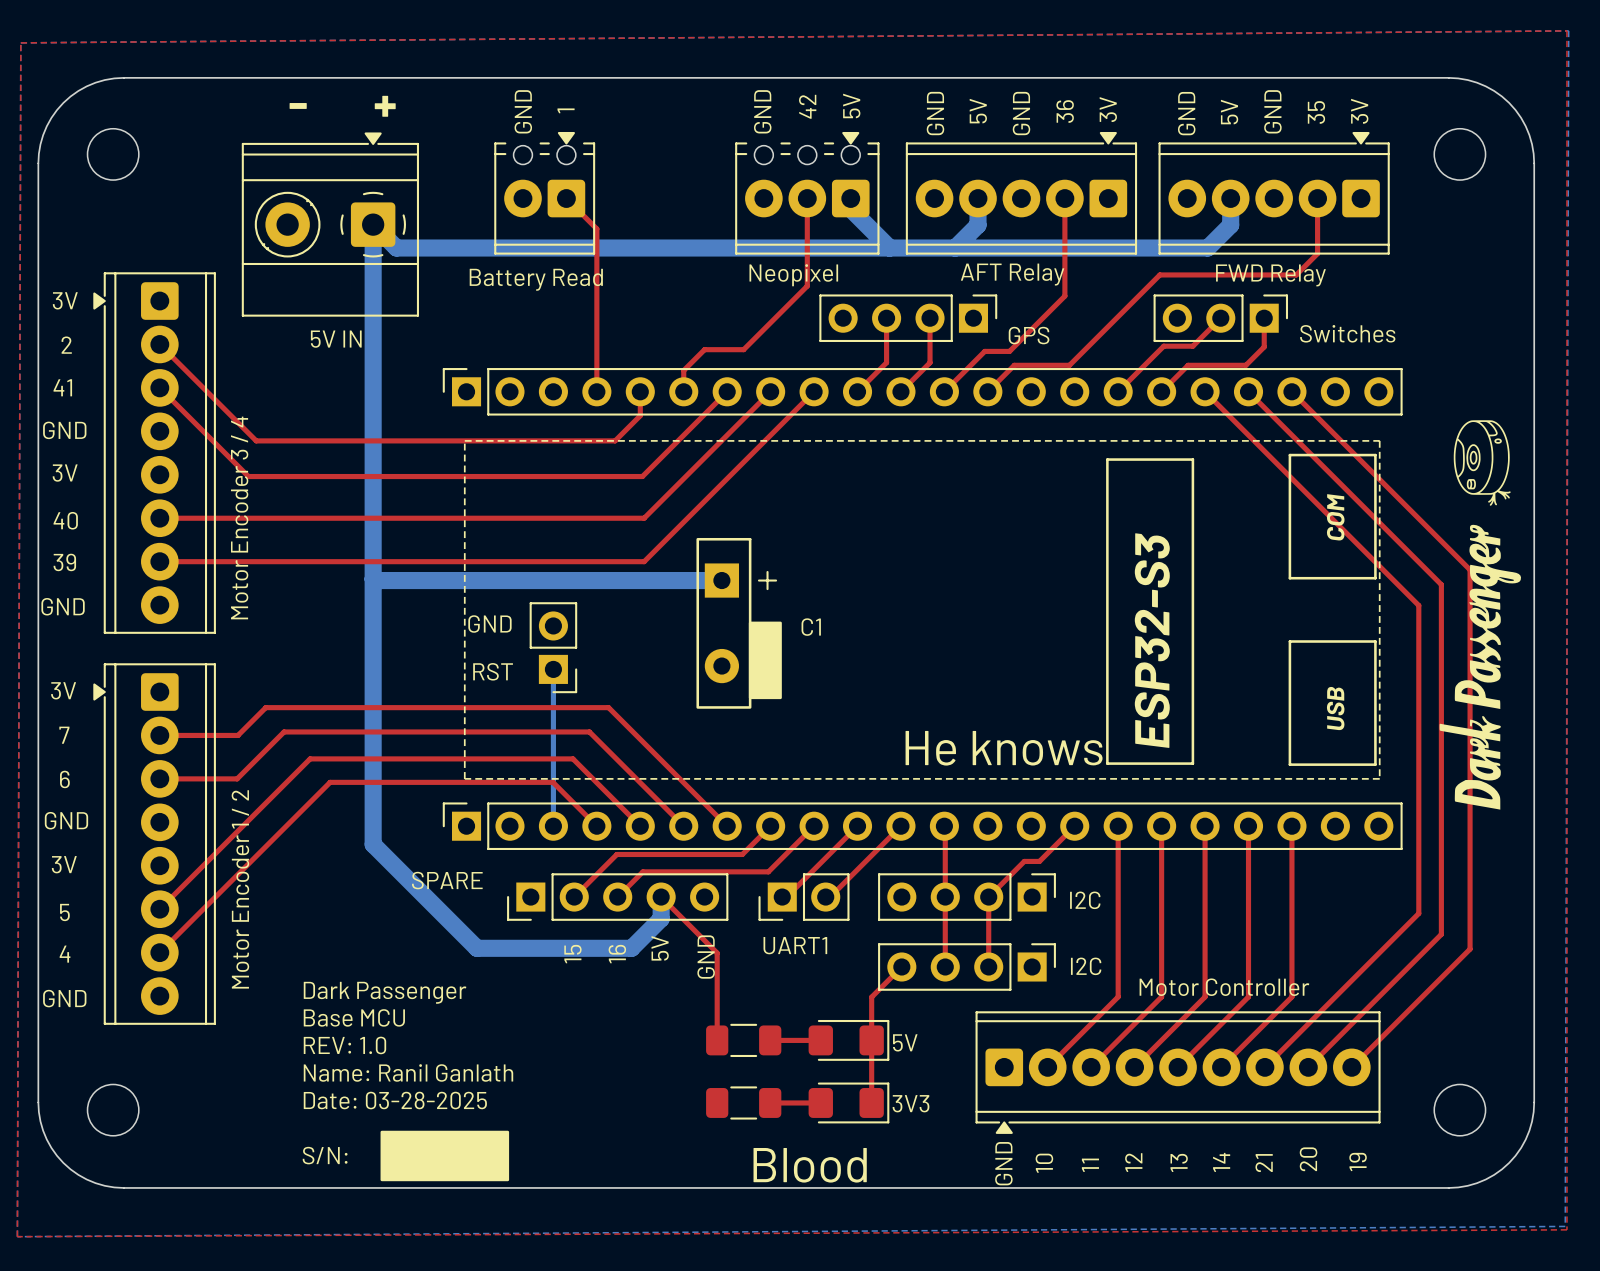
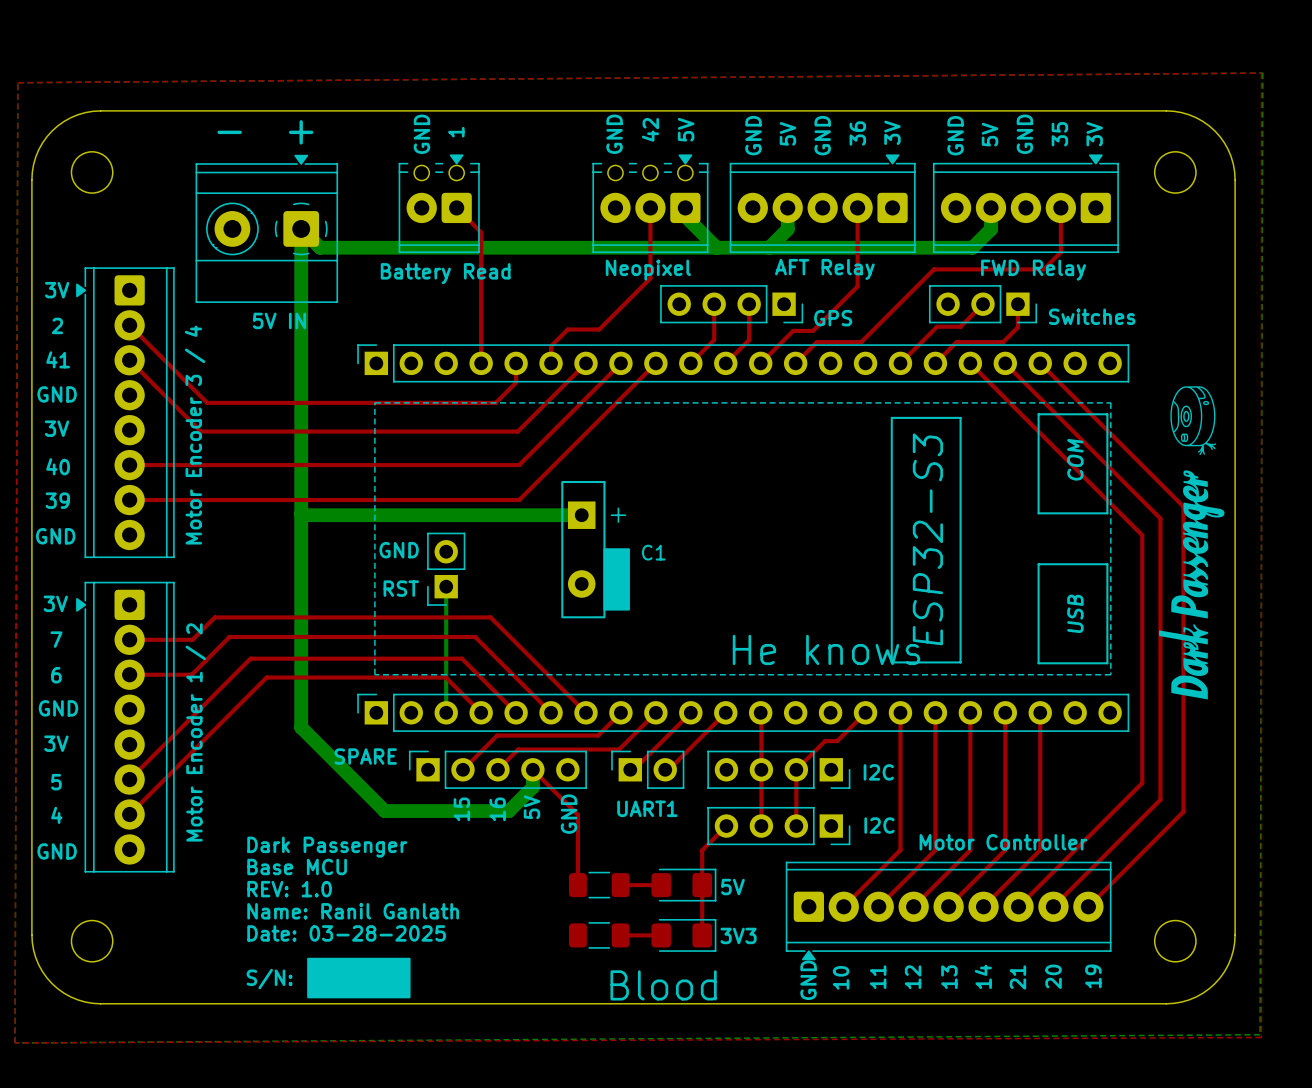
part footprint: [819, 294, 998, 342] -> [660, 285, 804, 324]
part footprint: [1153, 294, 1289, 342] -> [928, 285, 1038, 324]
part footprint: [529, 602, 578, 694] -> [427, 532, 466, 606]
part footprint: [507, 873, 729, 921] -> [408, 750, 587, 789]
part footprint: [758, 873, 850, 921] -> [611, 750, 685, 789]
part footprint: [878, 873, 1056, 921] -> [707, 750, 851, 789]
part footprint: [878, 943, 1056, 991] -> [707, 806, 851, 846]

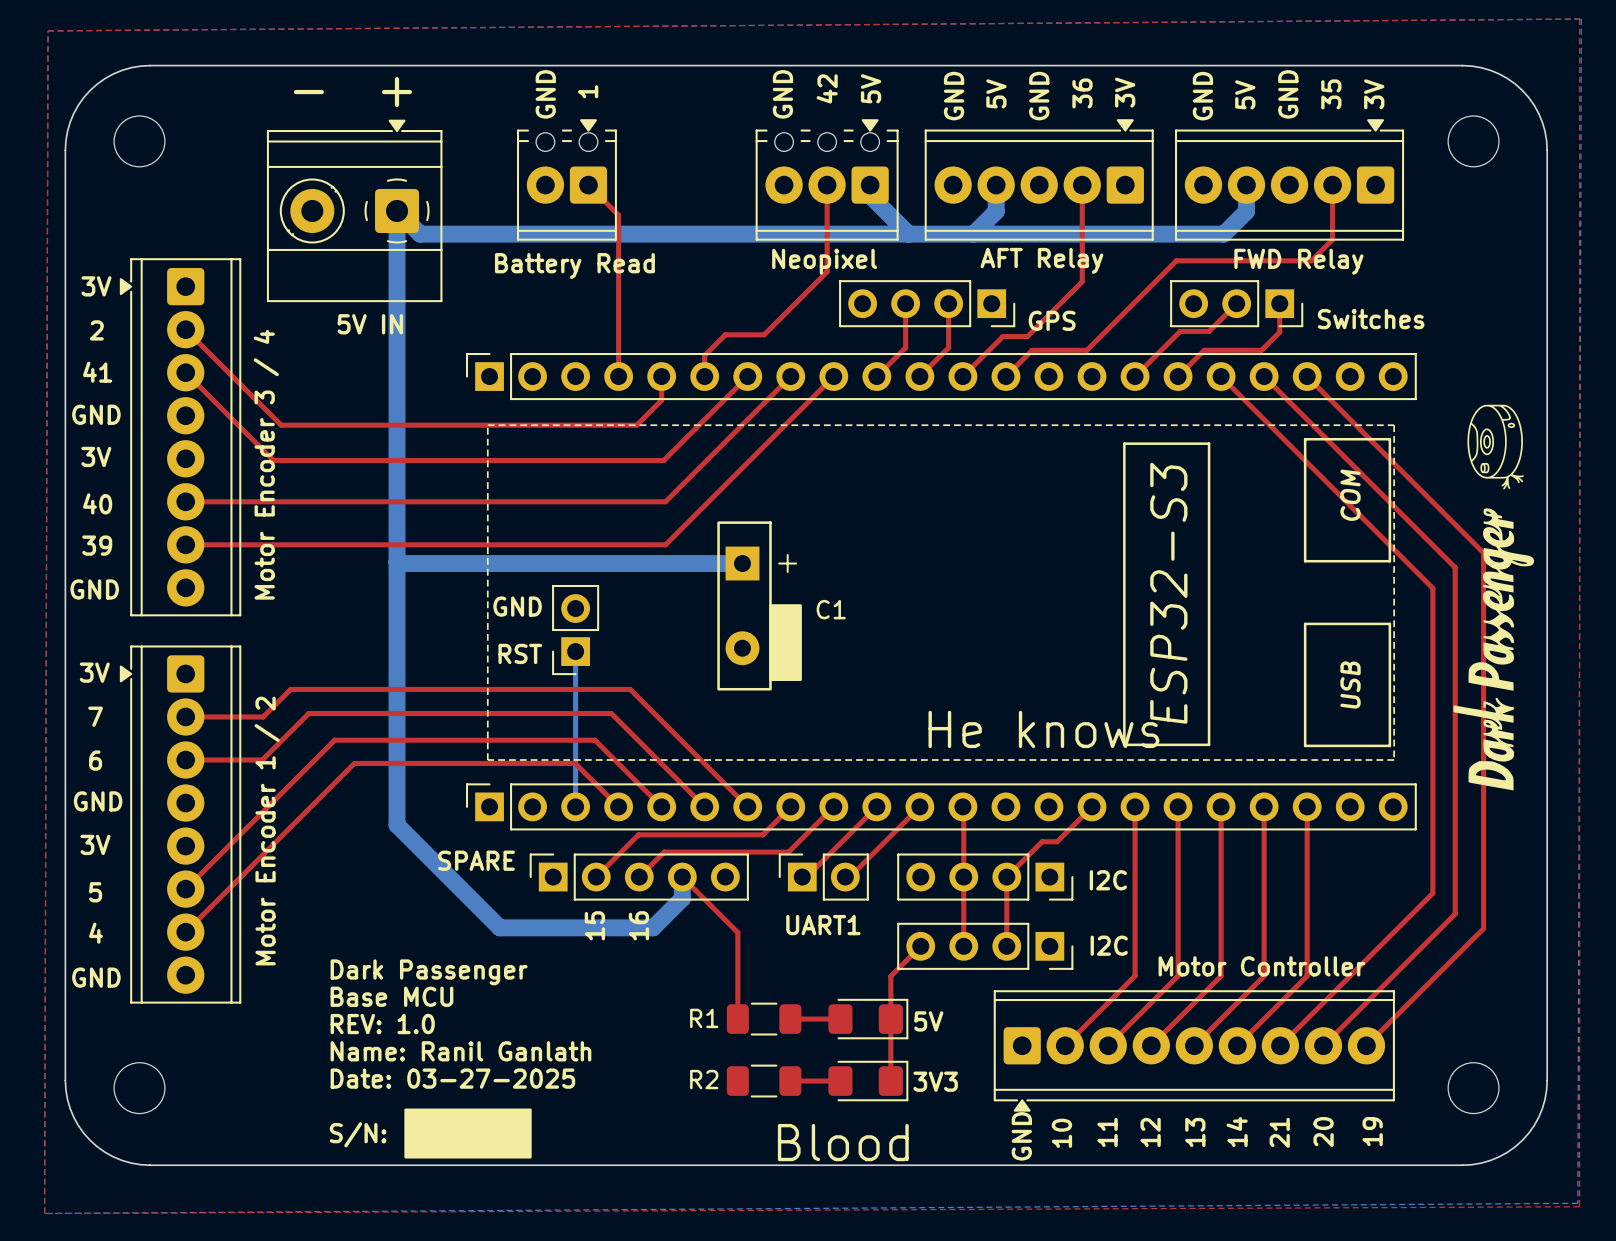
text: 5V (532, 807) -> none
text: GND (569, 814) -> none
R1 name: none -> R1 (704, 1018)
text: Date: 03-28-2025 (346, 933) -> Date: 03-27-2025 (452, 1078)
R2 name: none -> R2 (704, 1079)

